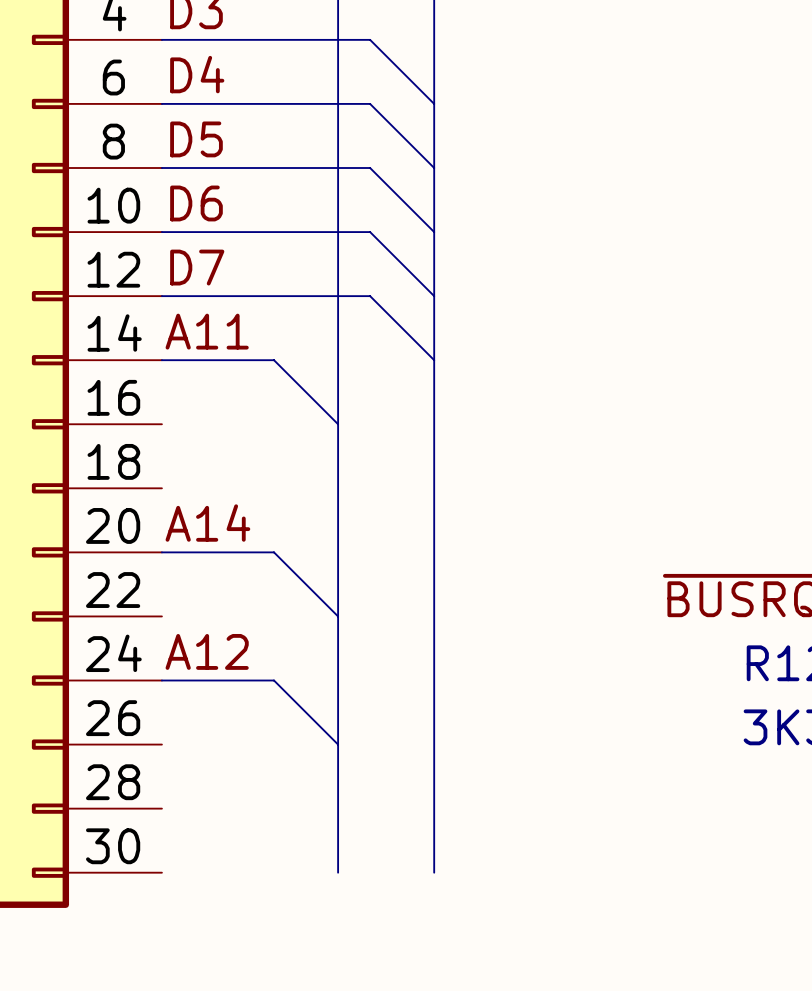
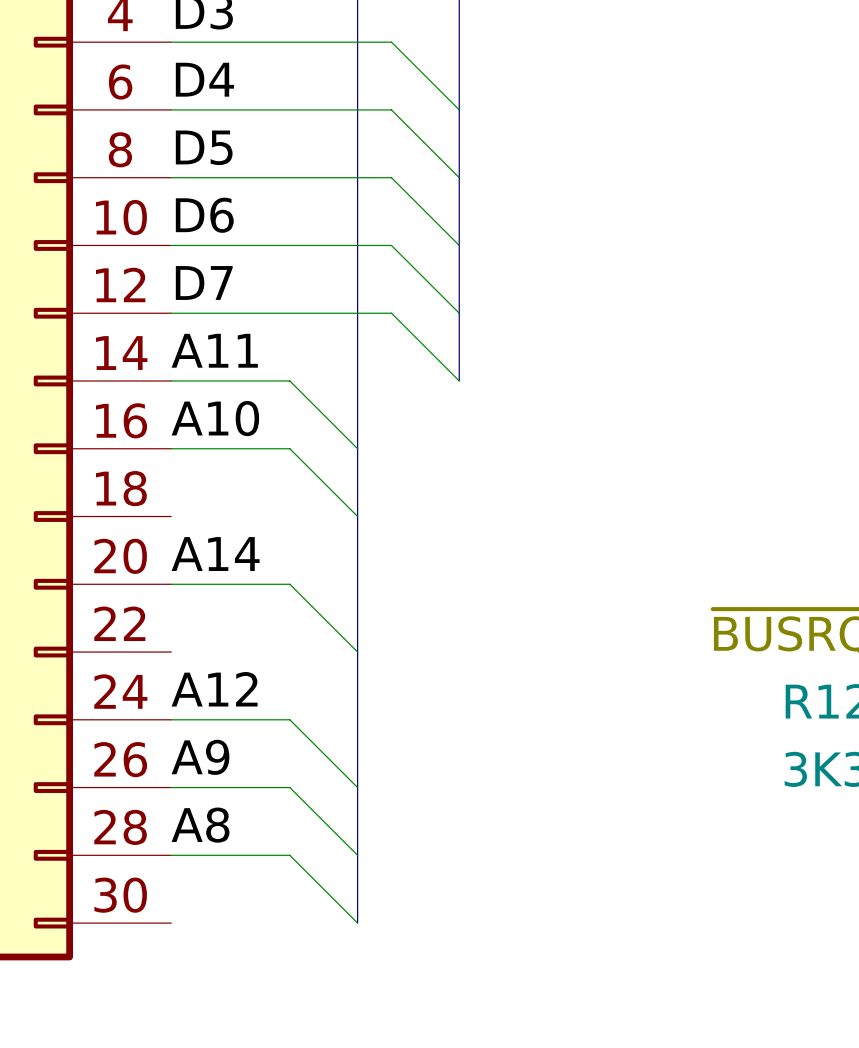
bus: (434, 360) (434, 872) -> none
label: none -> A10 (215, 418)
wire: none -> (171, 448) (289, 448) (357, 516)
label: none -> A9 (200, 757)
wire: none -> (171, 787) (289, 787) (357, 855)
label: none -> A8 (200, 825)
wire: none -> (171, 855) (289, 855) (357, 923)

